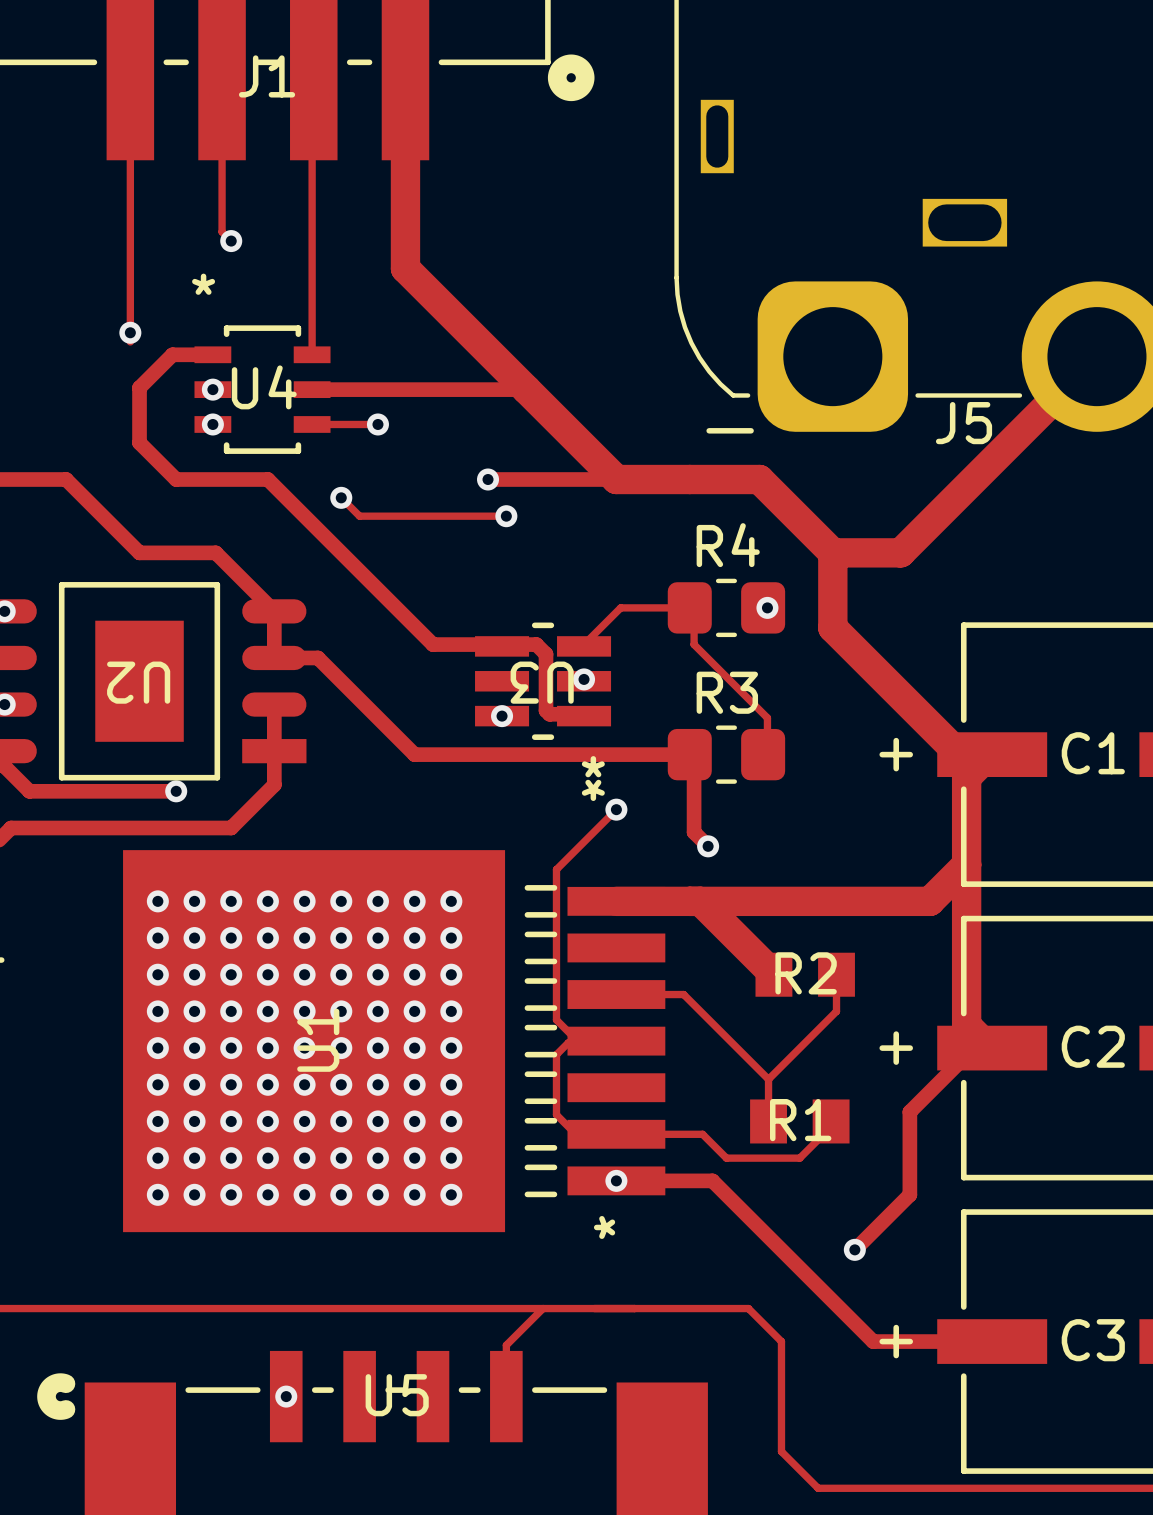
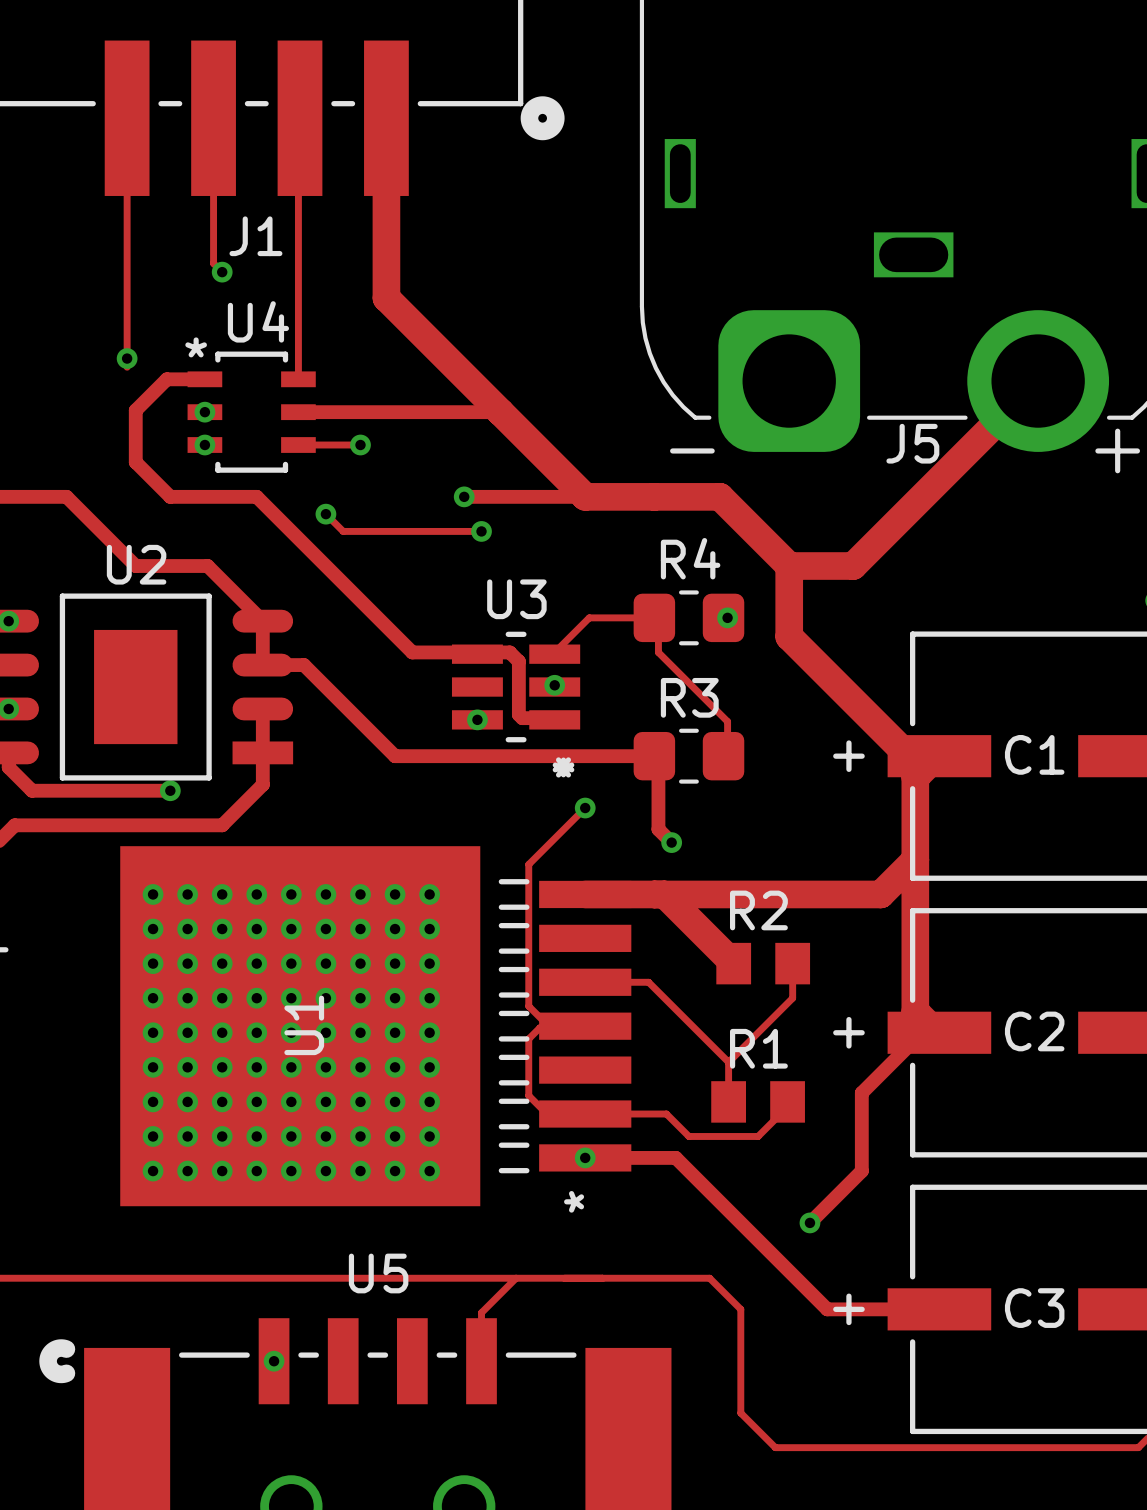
J1 name position: J1 (267, 76) -> J1 (255, 236)
U4 text position: * (203, 284) -> * (196, 347)
U4 name position: U4 (264, 387) -> U4 (258, 321)
U3 footprint: [475, 622, 612, 740] -> [451, 631, 581, 743]
U2 name rotation: 0° (138, 682) -> 180° (136, 564)
U2 name position: U2 (138, 682) -> U2 (136, 564)
U3 name position: U3 (542, 682) -> U3 (516, 599)
R2 name position: R2 (806, 973) -> R2 (758, 910)
R1 name position: R1 (800, 1120) -> R1 (758, 1048)
U5 name position: U5 (397, 1395) -> U5 (378, 1273)

